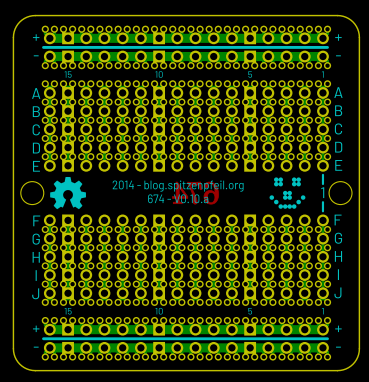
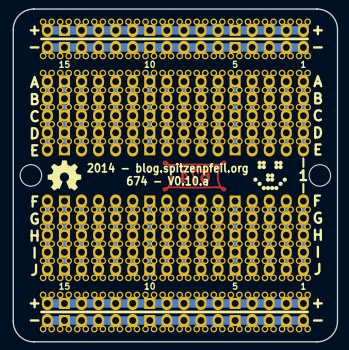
part footprint: [43, 32, 184, 45] -> [41, 23, 173, 38]
part footprint: [189, 32, 329, 45] -> [178, 23, 309, 38]
part footprint: [43, 50, 184, 63] -> [41, 40, 173, 55]
part footprint: [189, 50, 329, 63] -> [178, 40, 309, 55]
part footprint: [43, 87, 184, 99] -> [41, 74, 173, 89]
part footprint: [189, 87, 329, 99] -> [178, 74, 309, 89]
part footprint: [43, 105, 184, 118] -> [41, 91, 173, 106]
part footprint: [189, 105, 329, 118] -> [178, 91, 309, 106]
part footprint: [43, 123, 184, 136] -> [41, 108, 173, 123]
part footprint: [189, 123, 329, 136] -> [178, 108, 309, 123]
part footprint: [43, 141, 184, 154] -> [41, 126, 173, 140]
part footprint: [189, 141, 329, 154] -> [178, 126, 309, 140]
part footprint: [43, 159, 184, 172] -> [41, 143, 173, 157]
part footprint: [189, 159, 329, 172] -> [178, 143, 309, 157]
drawing: none -> [162, 160, 227, 192]
drawing: [172, 181, 219, 205] -> none
part footprint: [43, 214, 184, 227] -> [41, 194, 173, 208]
part footprint: [189, 214, 329, 227] -> [178, 194, 309, 208]
part footprint: [43, 232, 184, 245] -> [41, 211, 173, 225]
part footprint: [189, 232, 329, 245] -> [178, 211, 309, 225]
part footprint: [43, 250, 184, 263] -> [41, 228, 173, 242]
part footprint: [189, 250, 329, 263] -> [178, 228, 309, 242]
part footprint: [43, 269, 184, 281] -> [41, 245, 173, 259]
part footprint: [189, 269, 329, 281] -> [178, 245, 309, 259]
part footprint: [43, 287, 184, 300] -> [41, 262, 173, 277]
part footprint: [189, 287, 329, 300] -> [178, 262, 309, 277]
part footprint: [43, 323, 184, 336] -> [41, 296, 173, 311]
part footprint: [189, 323, 329, 336] -> [178, 296, 309, 311]
part footprint: [43, 341, 184, 354] -> [41, 313, 173, 328]
part footprint: [189, 341, 329, 354] -> [178, 313, 309, 328]

